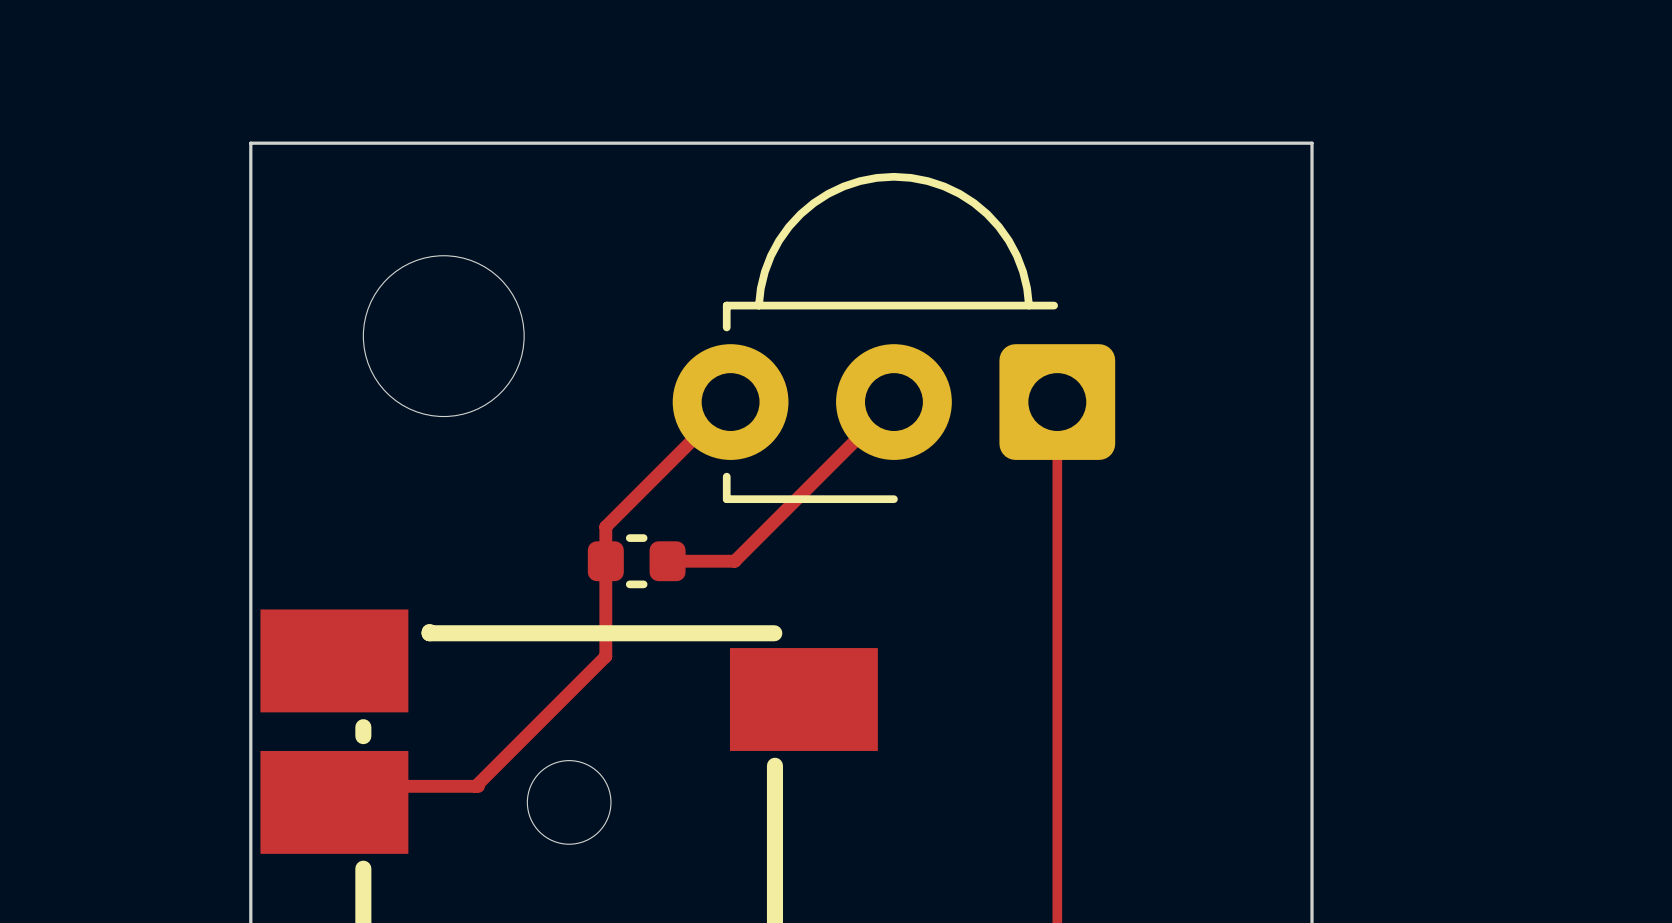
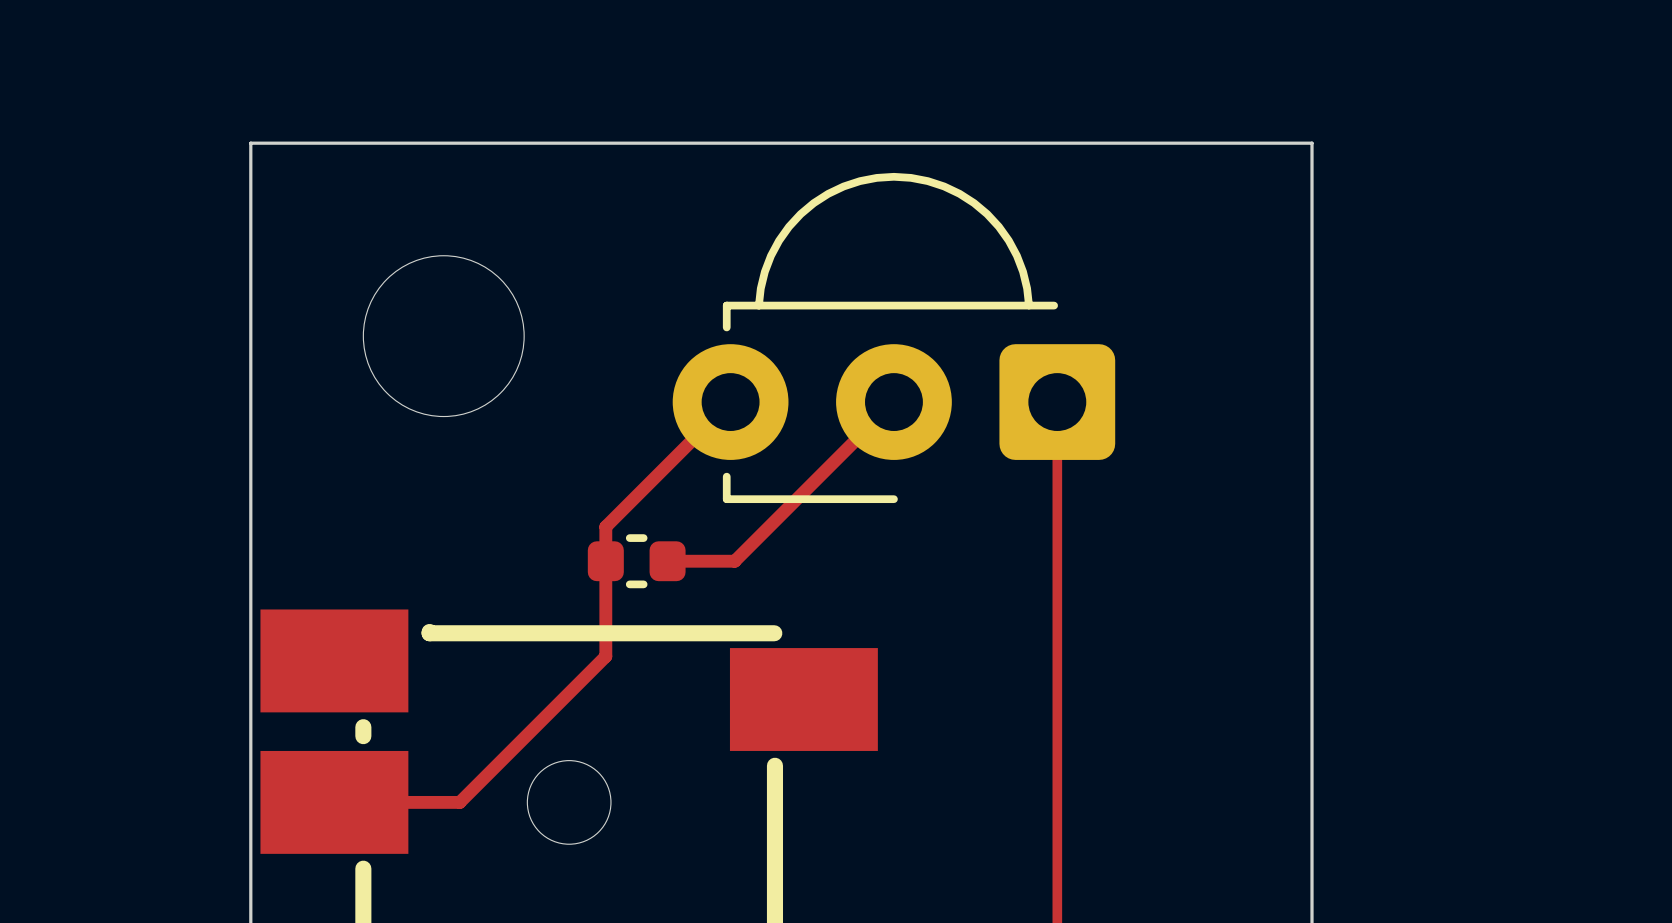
top track: (366, 786) (478, 786) -> (363, 802) (459, 802) (475, 786)

